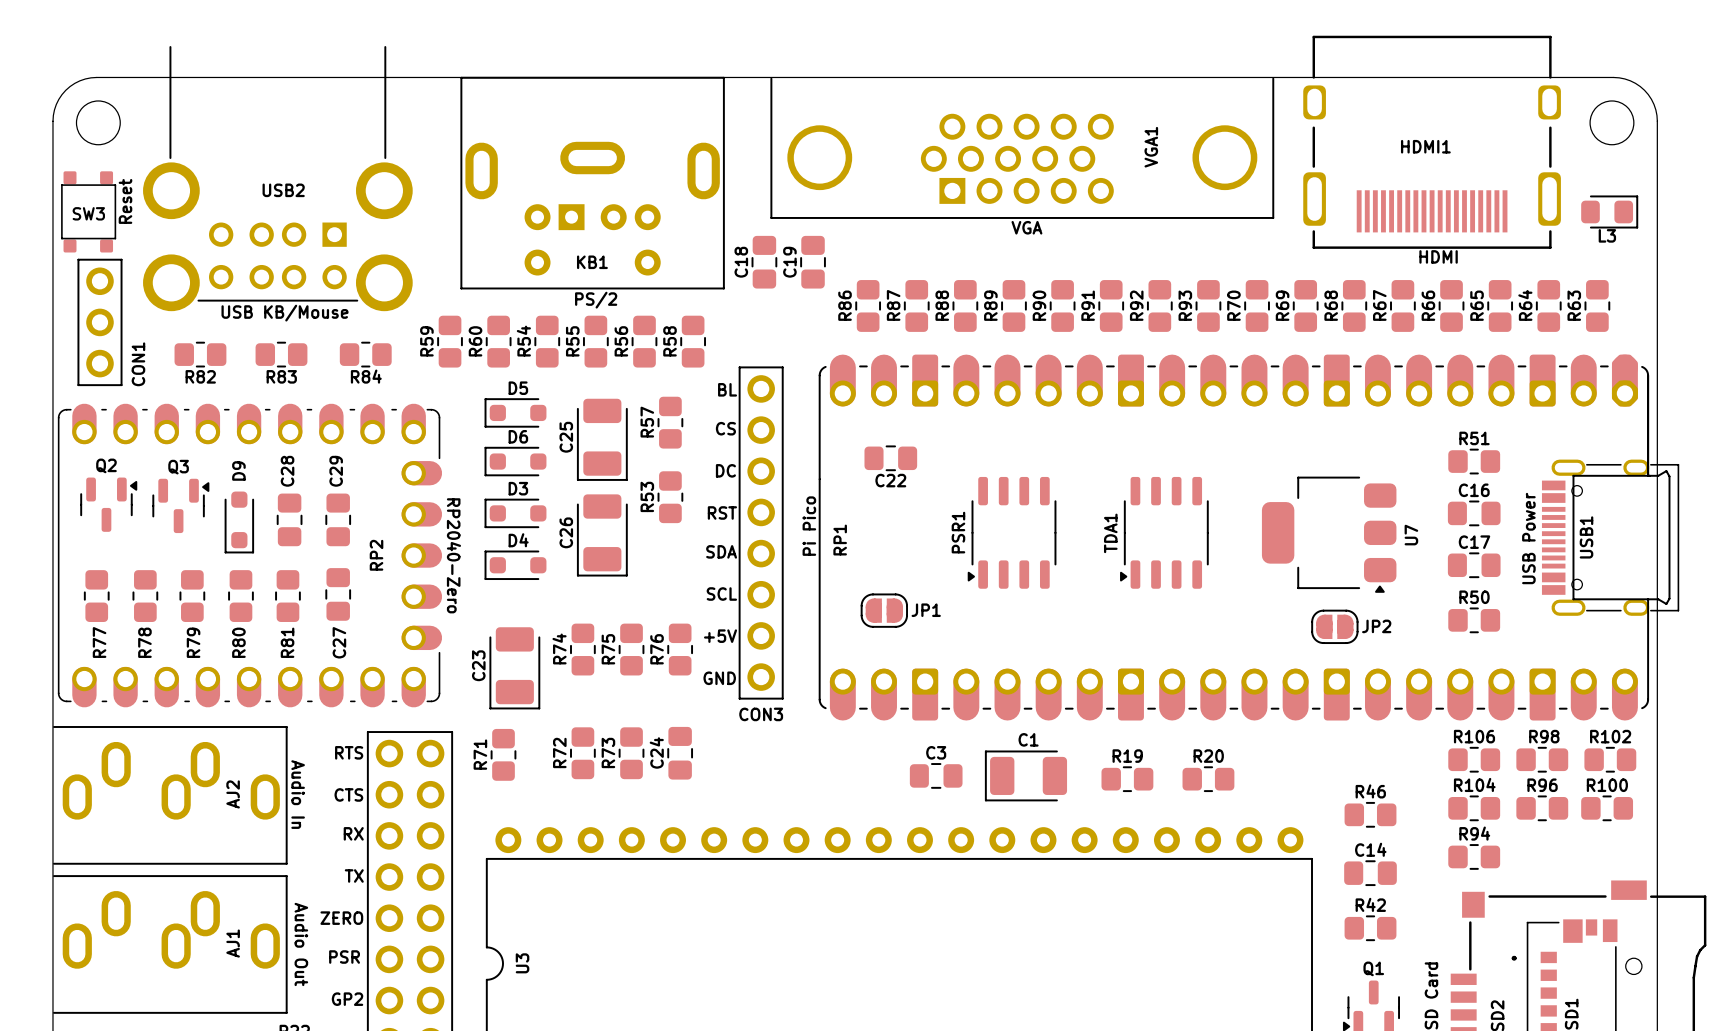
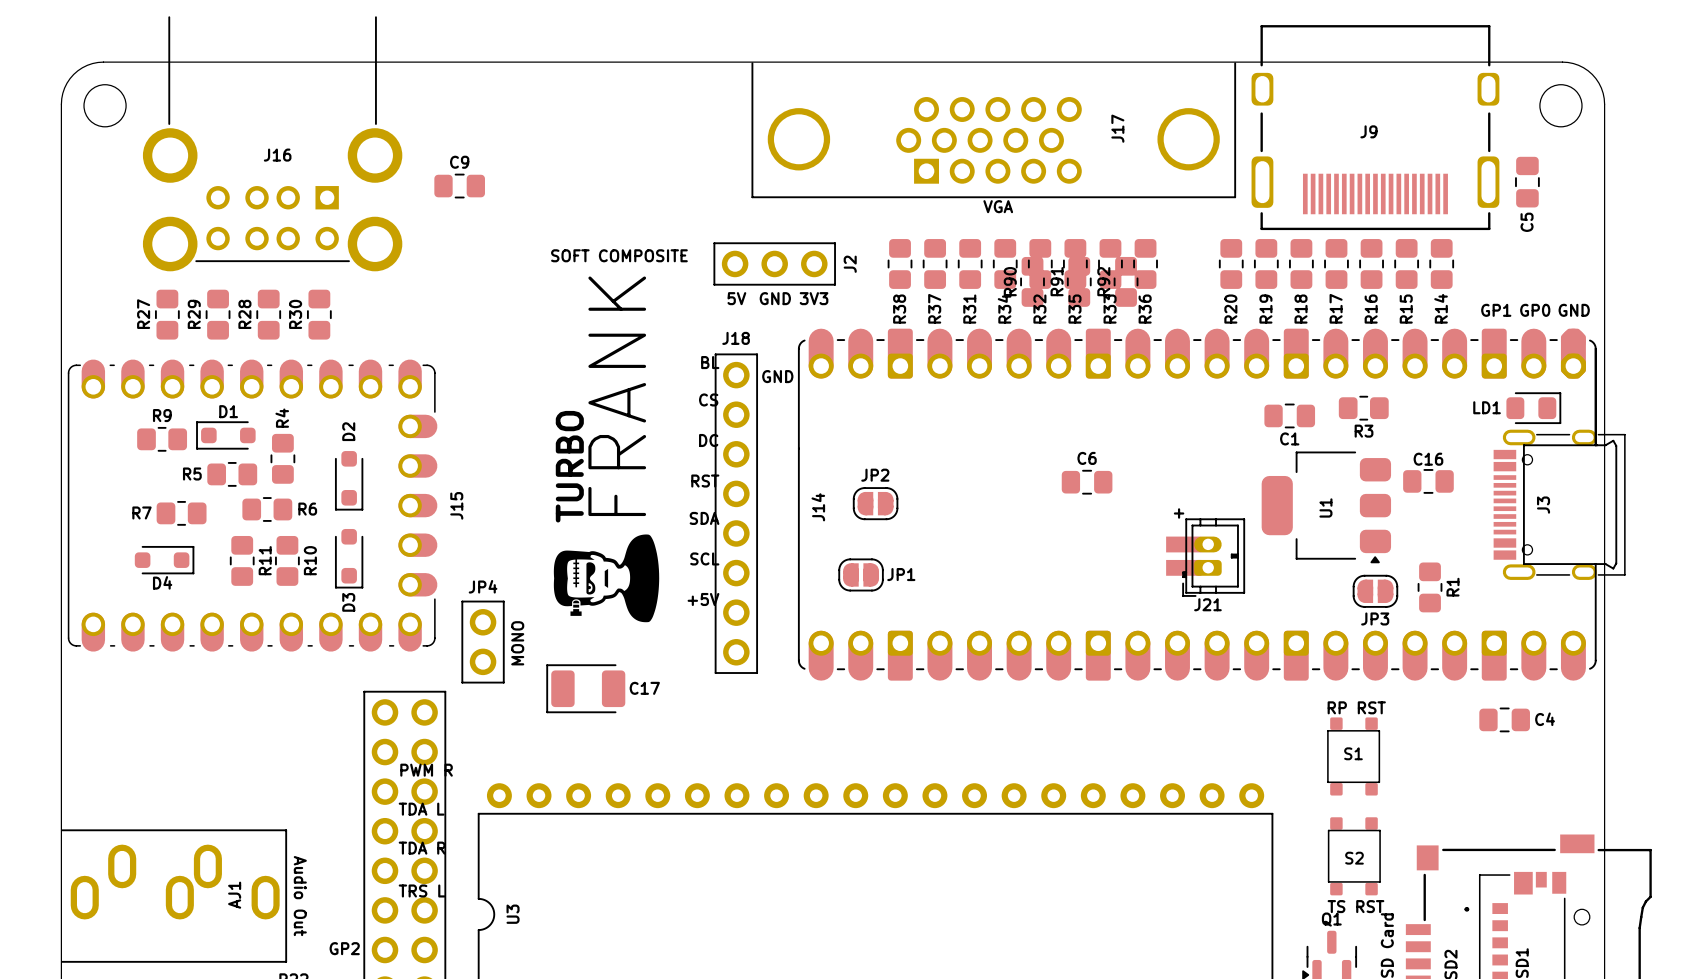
HDMI1 position: (1432, 142) -> (1375, 127)
HDMI1 name: HDMI1 (1425, 146) -> J9 (1368, 131)
VGA1 name: VGA1 (1151, 147) -> J17 (1117, 128)
J16: none -> (272, 143)
USB2: (277, 178) -> none
KB1: (592, 183) -> none
text: Reset (125, 201) -> none
C5: none -> (1527, 182)
C9: none -> (459, 186)
SW3: (88, 211) -> none
L3: (1609, 211) -> none
text: HDMI (1438, 256) -> none
C18: (764, 262) -> none
C19: (813, 262) -> none
text: none -> SOFT COMPOSITE (619, 255)
J2: none -> (774, 263)
R38: none -> (900, 263)
R37: none -> (935, 263)
R31: none -> (970, 263)
R34: none -> (1005, 263)
R32: none -> (1040, 263)
R35: none -> (1075, 263)
R33: none -> (1110, 263)
R36: none -> (1145, 263)
R18: none -> (1301, 263)
R17: none -> (1336, 263)
R16: none -> (1371, 263)
R15: none -> (1406, 263)
R14: none -> (1441, 263)
text: PS/2 (596, 300) -> none
R86: (868, 305) -> none
R87: (916, 305) -> none
R88: (965, 305) -> none
R89: (1013, 305) -> none
R93: (1208, 305) -> none
R70: (1257, 305) -> none
R69: (1305, 305) -> none
R68: (1354, 305) -> none
R67: (1402, 305) -> none
R66: (1451, 305) -> none
R65: (1500, 305) -> none
R64: (1548, 305) -> none
R63: (1597, 305) -> none
text: USB KB/Mouse (285, 313) -> none
CON1: (99, 322) -> none
text: none -> 5V (736, 298)
text: none -> GND (775, 298)
text: none -> 3V3 (814, 298)
text: none -> GP1 (1496, 310)
text: none -> GP0 (1535, 310)
text: none -> GND (1574, 310)
R27: none -> (167, 314)
R29: none -> (218, 314)
R28: none -> (268, 314)
R30: none -> (319, 314)
R59: (450, 341) -> none
R60: (498, 341) -> none
R54: (547, 341) -> none
R55: (595, 341) -> none
R56: (644, 341) -> none
R58: (693, 341) -> none
R82: (200, 354) -> none
R83: (281, 354) -> none
R84: (365, 354) -> none
text: none -> GND (777, 376)
D5: (515, 412) -> none
R57: (670, 422) -> none
text: none -> FRANK (617, 396)
R3: none -> (1363, 408)
LD1: none -> (1533, 408)
C25: (602, 439) -> none
C22: (890, 458) -> none
D6: (515, 461) -> none
R51: (1474, 461) -> none
D1: none -> (225, 435)
R9: none -> (162, 439)
D3 name position: D3 (518, 488) -> D3 (348, 602)
R4: none -> (282, 458)
R53: (670, 497) -> none
text: none -> TURBO (569, 466)
Q2: (108, 504) -> none
Q3: (180, 505) -> none
R5: none -> (232, 474)
D2: none -> (349, 480)
D3 rotation: 0° (515, 513) -> 90° counterclockwise (349, 558)
D3 position: (515, 513) -> (349, 558)
C6: none -> (1087, 482)
C28: (289, 519) -> none
C29: (338, 519) -> none
D9: (239, 522) -> none
text: Pi Pico (809, 526) -> none
PSR1: (1012, 532) -> none
TDA1: (1164, 532) -> none
CON3 position: (761, 533) -> (736, 513)
U7: (1329, 534) -> none
C26: (602, 535) -> none
USB1 name: USB1 (1586, 537) -> J3 (1543, 505)
J15: none -> (252, 505)
text: USB Power (1528, 538) -> none
RP1 name: RP1 (840, 540) -> J14 (818, 507)
U1: none -> (1326, 507)
R6: none -> (267, 509)
C17 name position: C17 (1474, 542) -> C17 (644, 688)
R7: none -> (181, 513)
text: none -> + (1179, 513)
C17 footprint: [1447, 552, 1501, 579] -> [546, 664, 626, 714]
RP2: (249, 555) -> none
text: RP2040-Zero (453, 555) -> none
D4 rotation: 0° (515, 565) -> 180° (164, 560)
D4 position: (515, 565) -> (164, 560)
drawing: none -> [553, 534, 660, 623]
J21: none -> (1205, 557)
C27: (338, 594) -> none
R77: (96, 596) -> none
R78: (145, 596) -> none
R79: (192, 596) -> none
R50: (1474, 620) -> none
R1: none -> (1430, 587)
JP2 position: (1334, 626) -> (875, 503)
JP2 name position: JP2 (1376, 626) -> JP2 (875, 475)
JP3: none -> (1375, 591)
R80 name: R80 (238, 642) -> R11 (265, 560)
R81 name: R81 (287, 642) -> R10 (310, 560)
R74: (582, 649) -> none
R75: (631, 649) -> none
R76: (680, 649) -> none
C23: (514, 668) -> none
text: GND (719, 678) -> none
JP4: none -> (483, 642)
text: none -> MONO (517, 643)
CON3 name: CON3 (761, 714) -> J18 (736, 338)
C1 name position: C1 (1028, 739) -> C1 (1289, 438)
text: none -> RP RST (1356, 707)
C1 footprint: [984, 750, 1068, 802] -> [1264, 403, 1316, 429]
text: RTS (349, 752) -> none
R72: (582, 753) -> none
R73: (631, 753) -> none
C24: (680, 753) -> none
R71: (503, 754) -> none
R19 name position: R19 (1127, 756) -> R19 (1265, 309)
R20 name position: R20 (1208, 756) -> R20 (1230, 309)
R106: (1474, 759) -> none
R98: (1542, 759) -> none
R102: (1610, 759) -> none
C4: none -> (1504, 719)
C3: (936, 775) -> none
R19 rotation: 0° (1127, 779) -> 90° clockwise (1266, 263)
R19 position: (1127, 779) -> (1266, 263)
R20 rotation: 0° (1208, 779) -> 90° clockwise (1231, 263)
R20 position: (1208, 779) -> (1231, 263)
text: Audio In (298, 794) -> none
text: CTS (348, 794) -> none
AJ2: (170, 795) -> none
S1: none -> (1353, 756)
R104: (1474, 808) -> none
R96: (1542, 808) -> none
R100: (1607, 808) -> none
text: none -> PWM R (426, 770)
R46: (1370, 814) -> none
text: RX (353, 833) -> none
text: none -> TDA L (421, 809)
R94: (1474, 856) -> none
C14: (1370, 873) -> none
text: TX (354, 875) -> none
text: none -> TDA R (422, 848)
S2: none -> (1354, 856)
text: ZERO (341, 918) -> none
R42: (1370, 928) -> none
text: none -> TRS L (422, 890)
text: none -> TS RST (1355, 906)
text: PSR (344, 957) -> none

